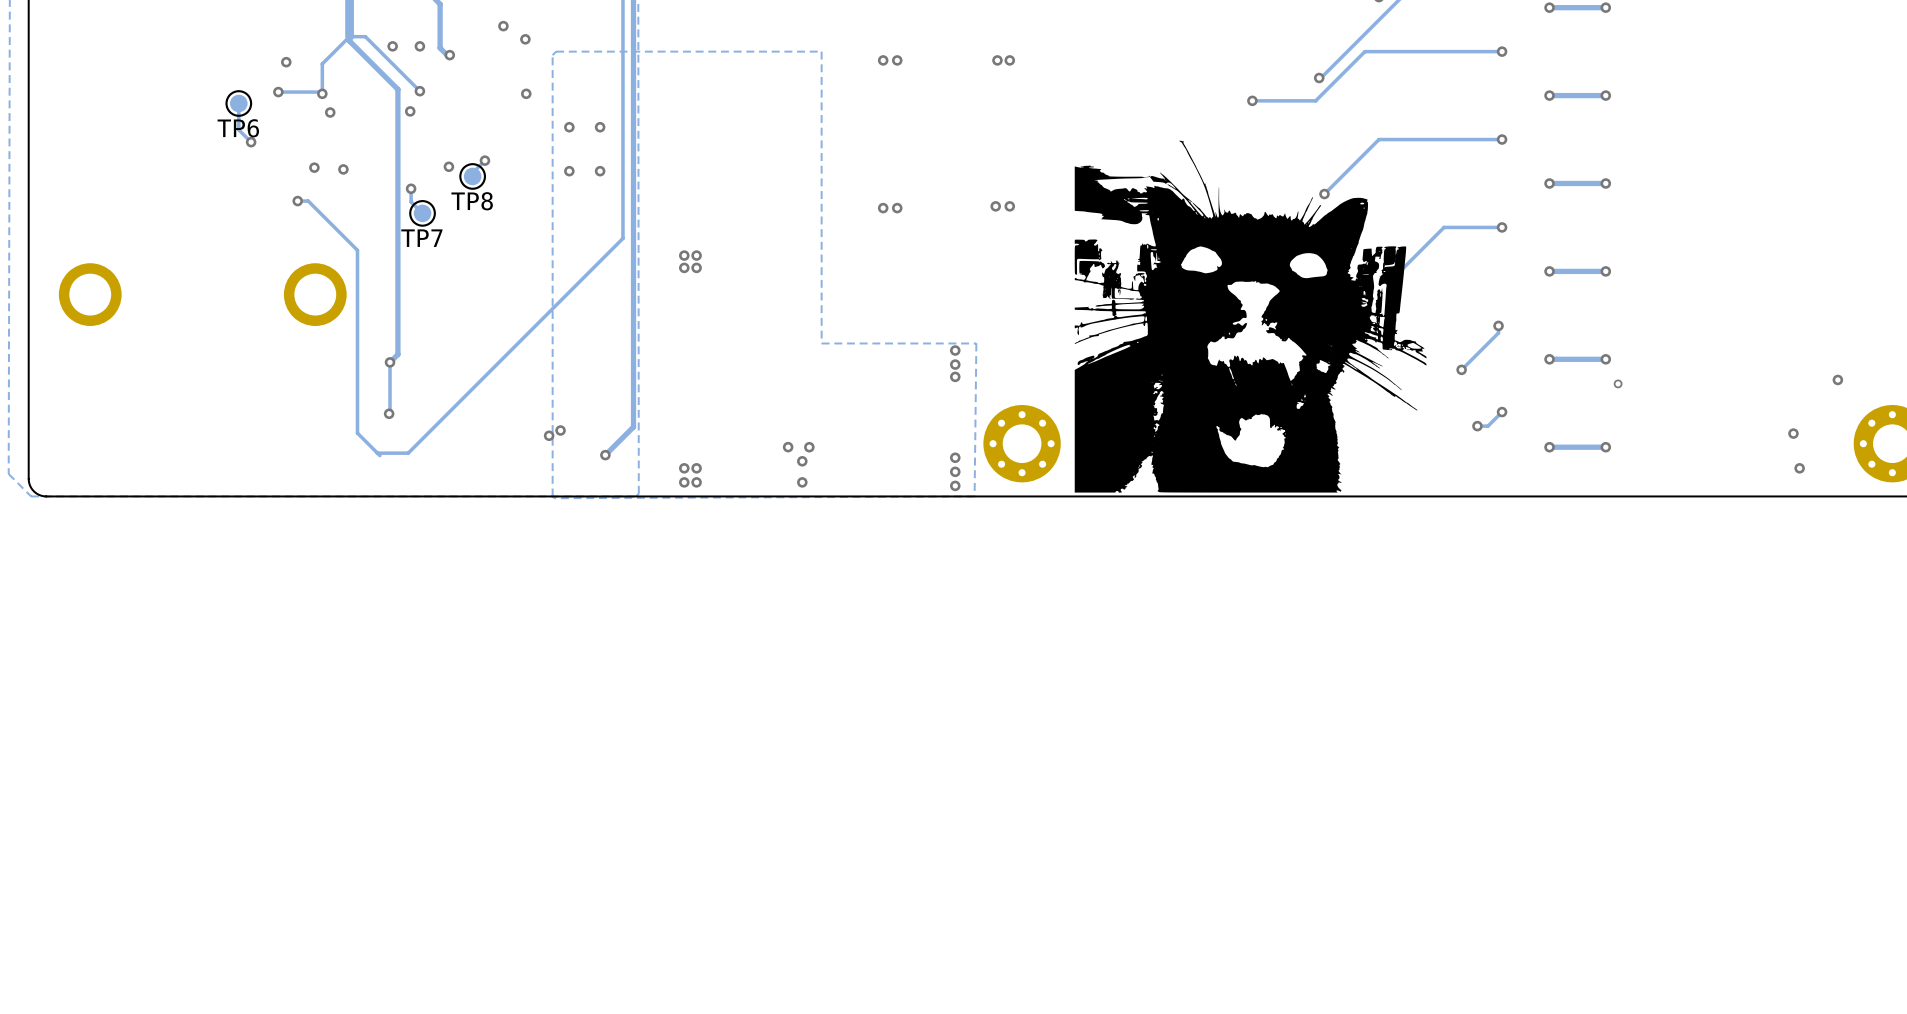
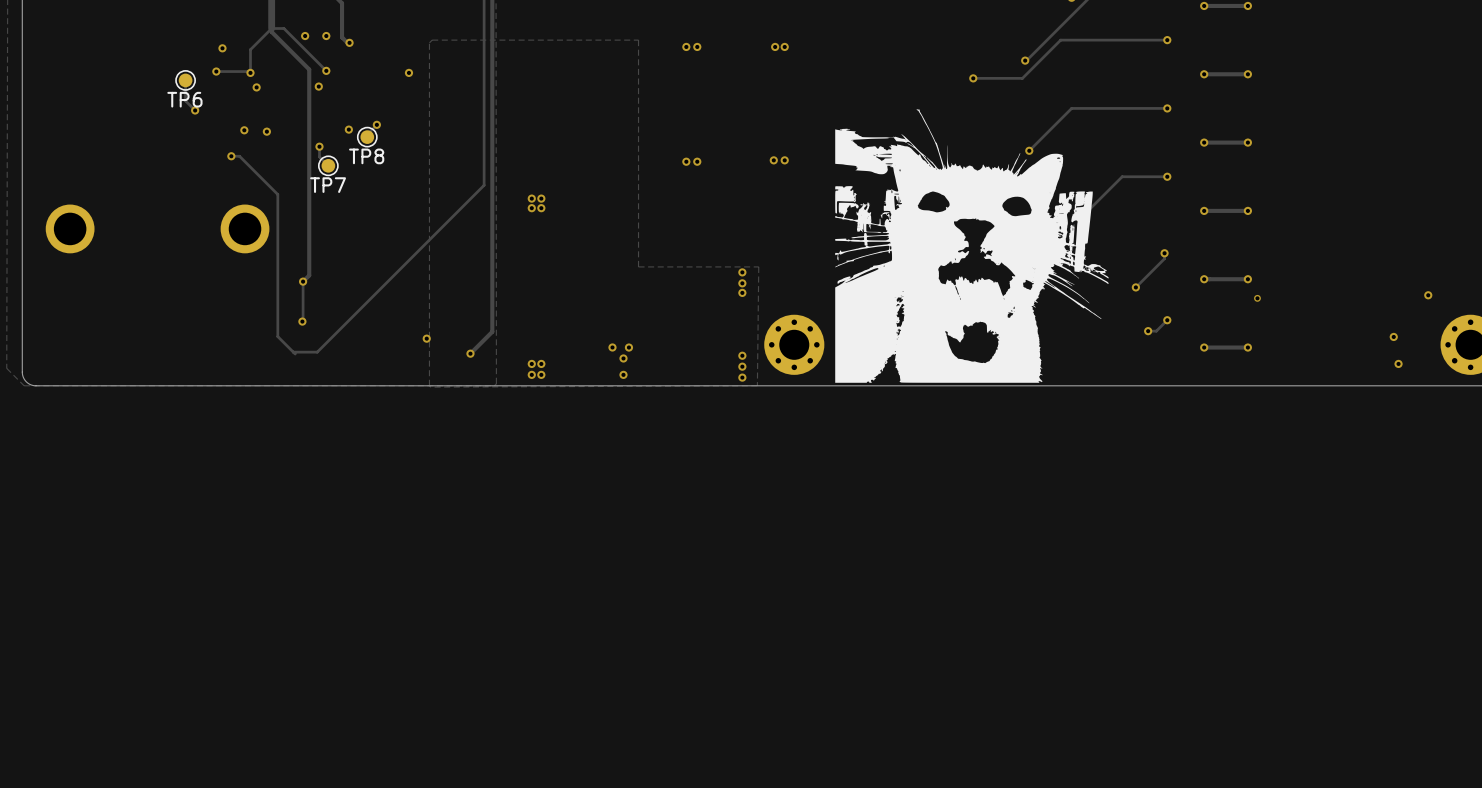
via: (503, 26) -> none
via: (525, 39) -> none
via: (569, 127) -> none
via: (600, 127) -> none
via: (569, 171) -> none
via: (600, 171) -> none
via: (560, 430) -> none

